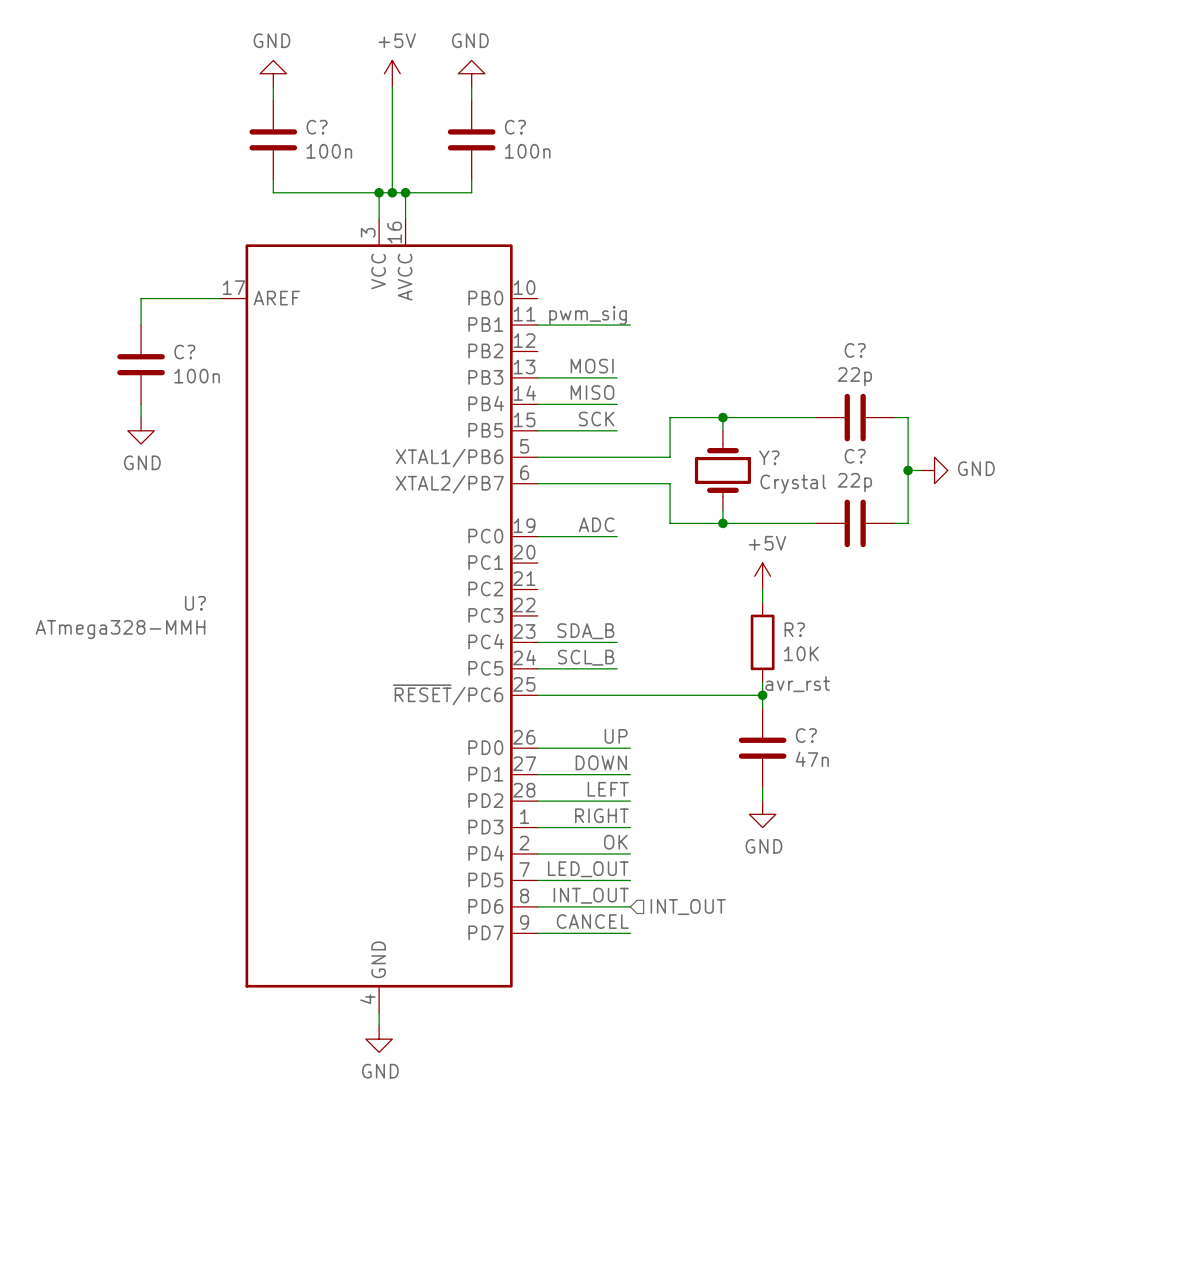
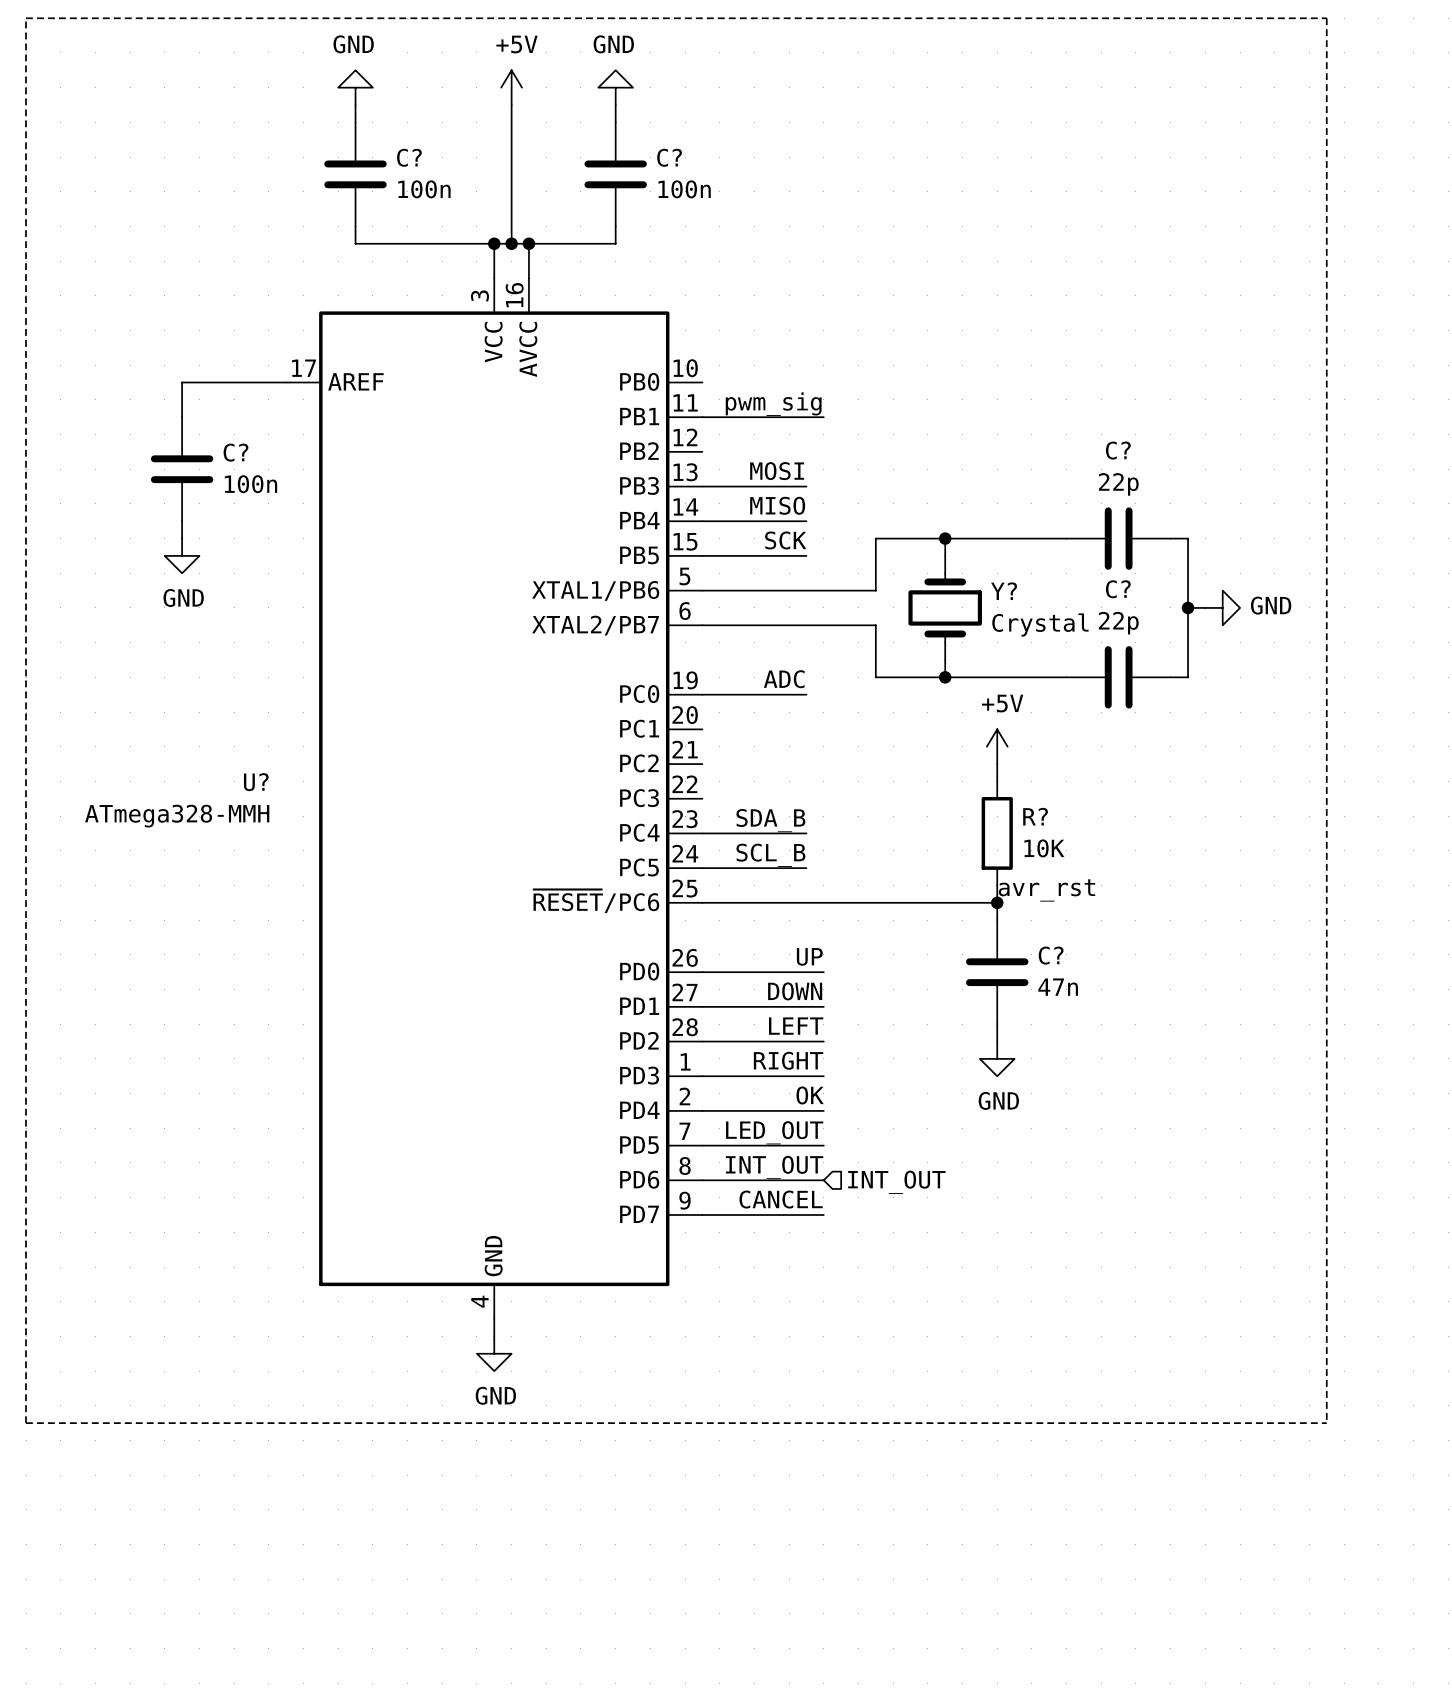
line: none -> (26, 18) (26, 1423) (1326, 1423) (1326, 18) (26, 18)

